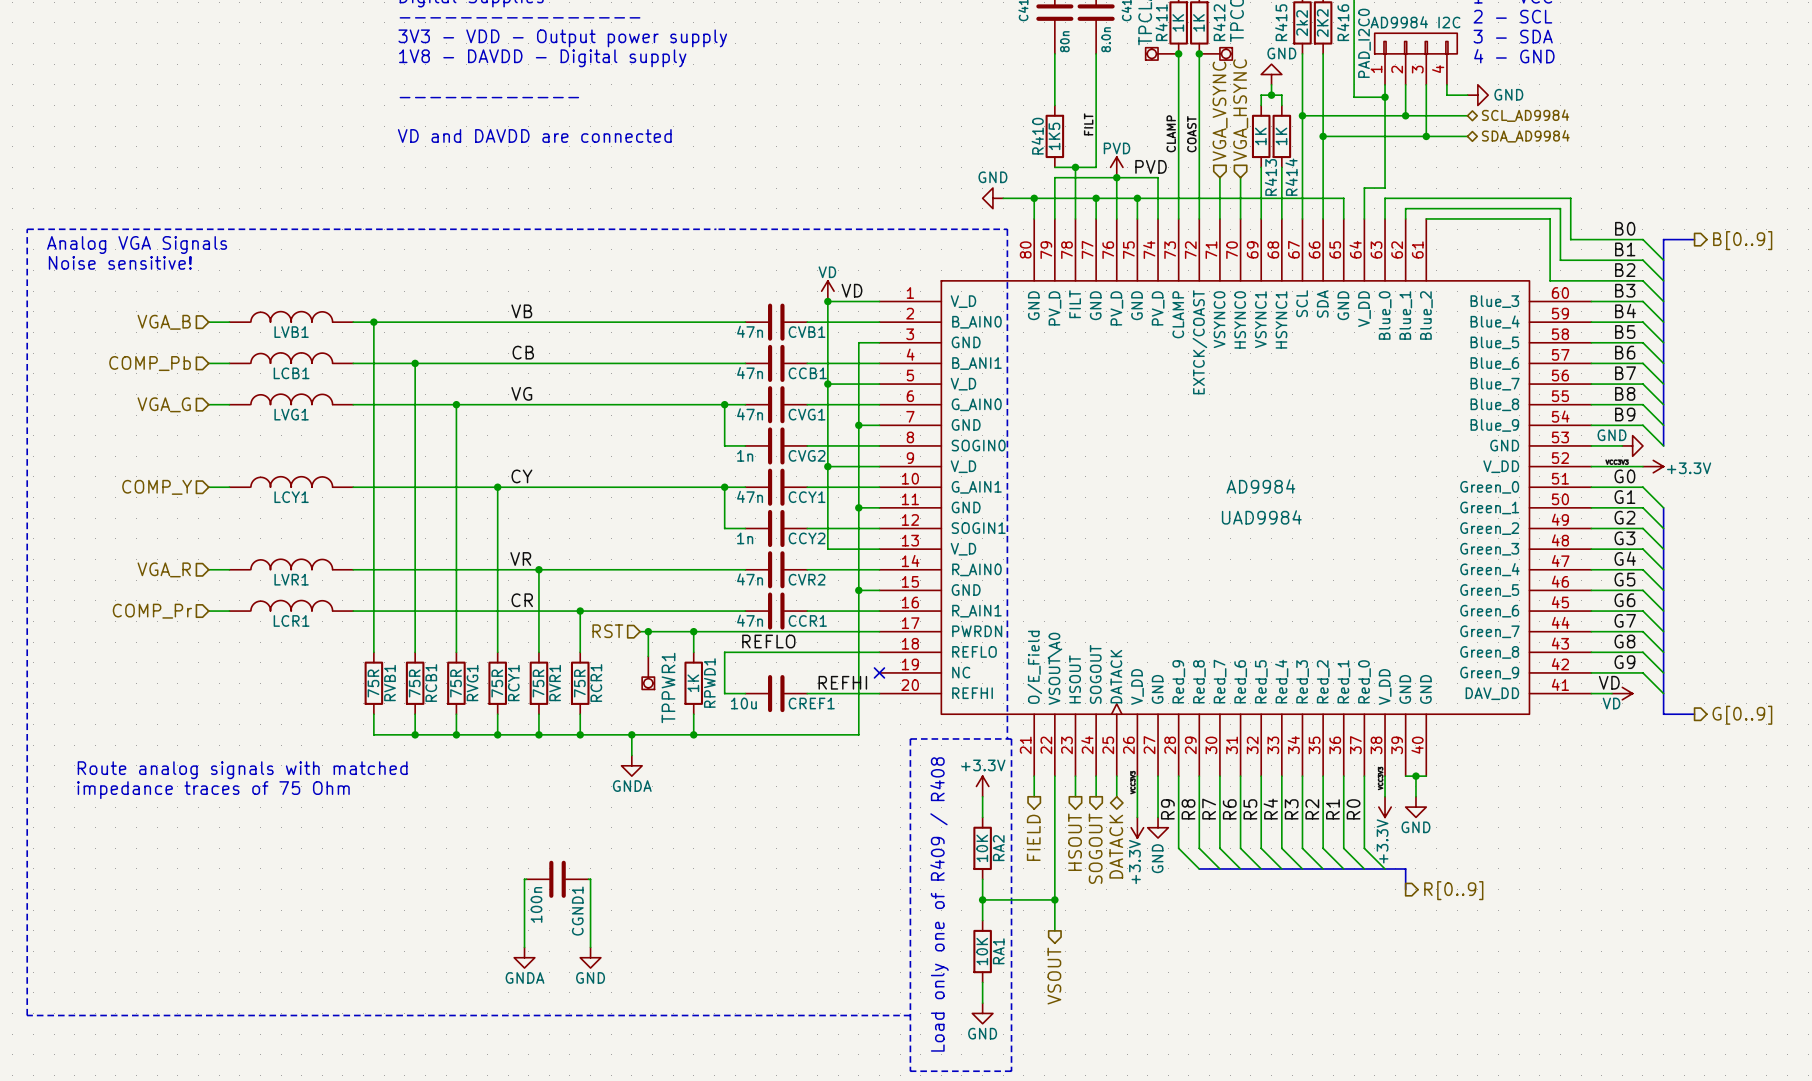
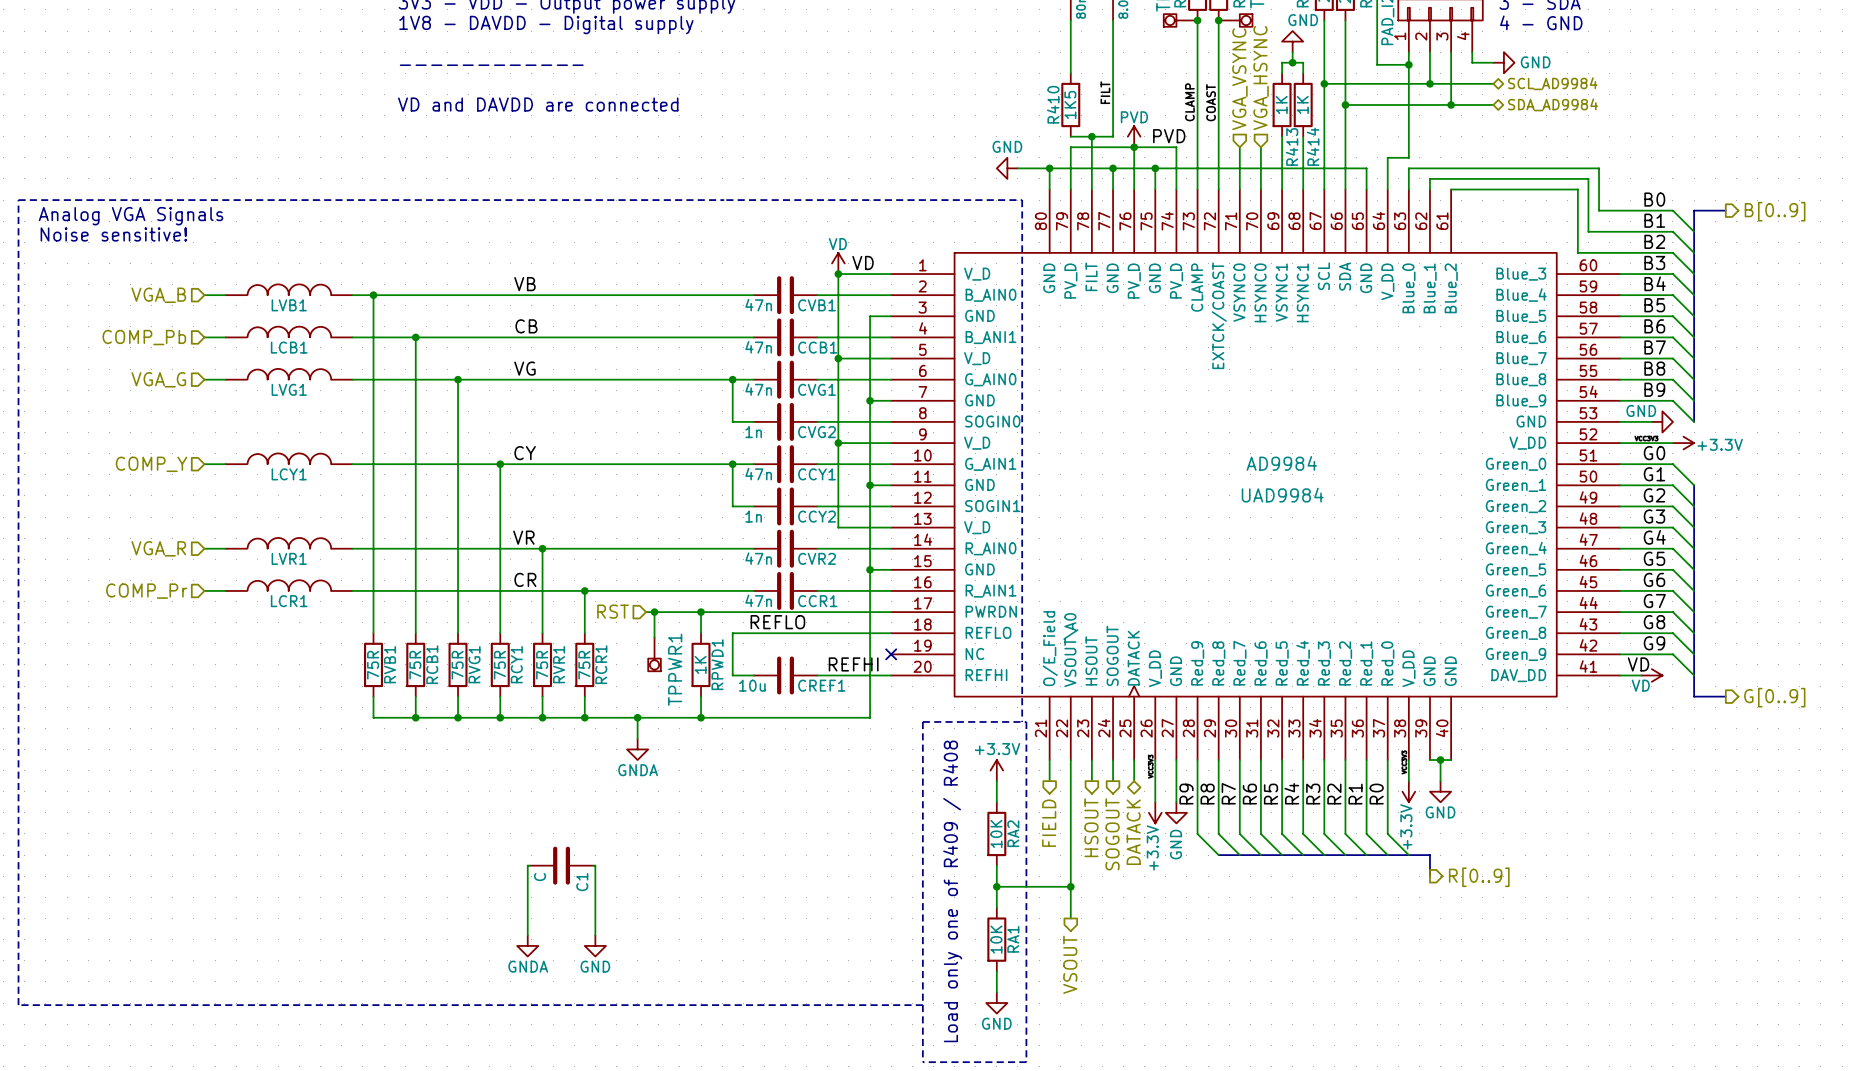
text: Route analog signals with matched (242, 770) -> none
text: impedance traces of 75 Ohm (213, 790) -> none
CGND1 value: 100n (536, 904) -> C (540, 877)
CGND1 name: CGND1 (577, 911) -> C1 (582, 882)

